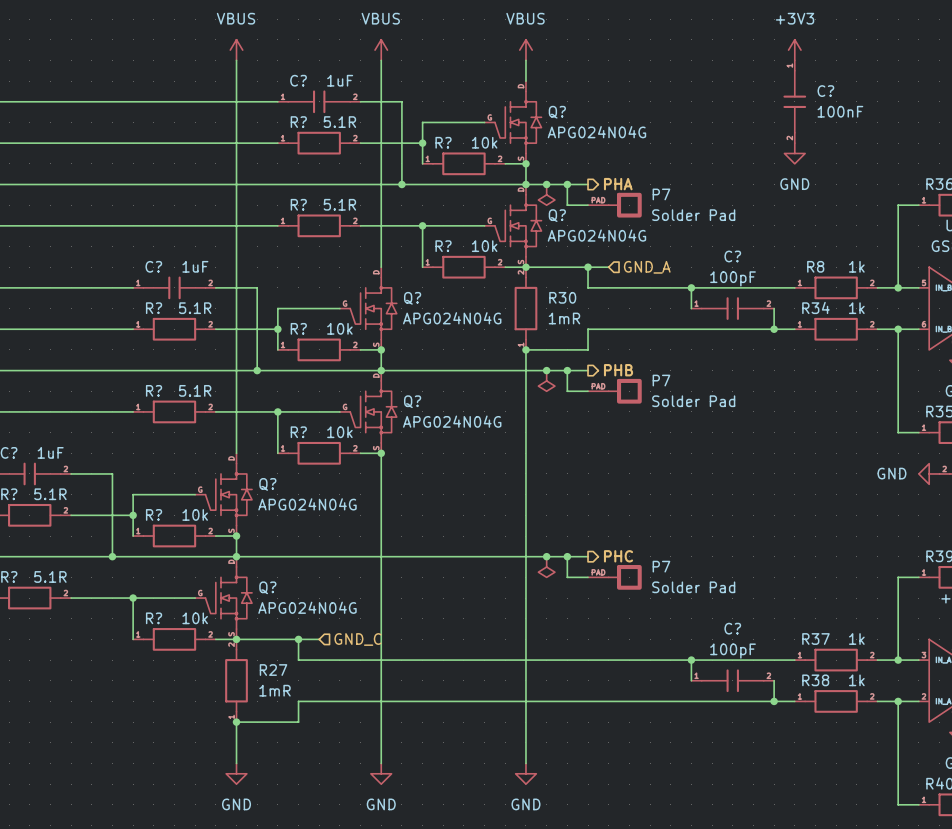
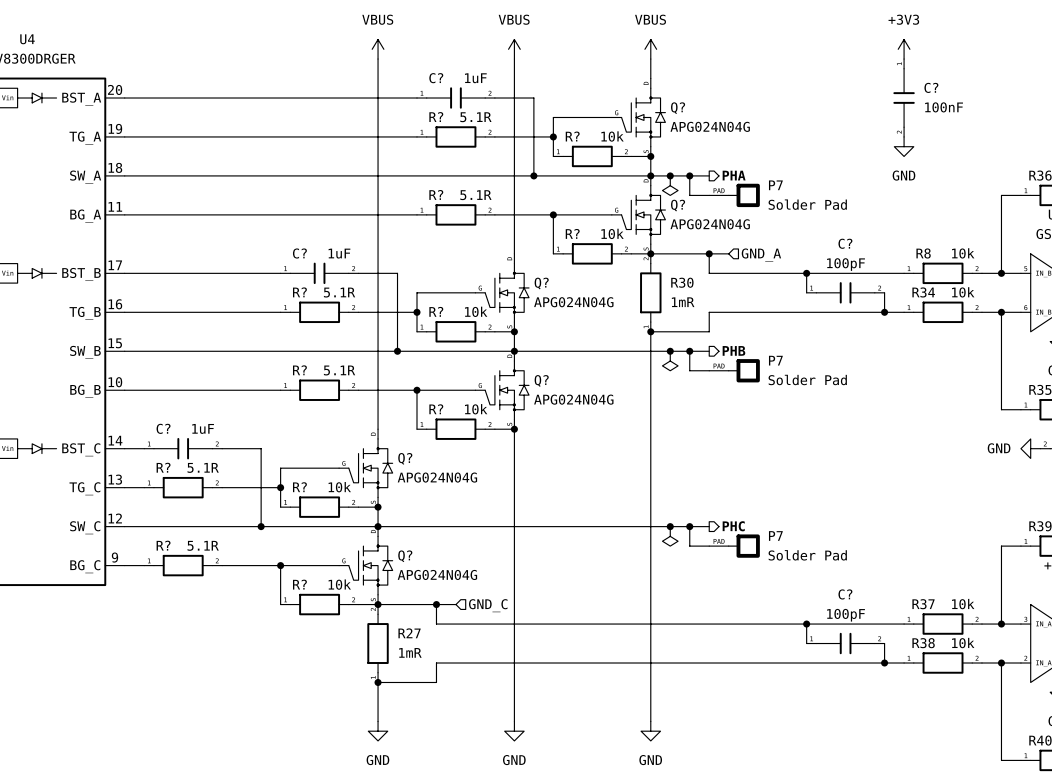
R8 value: 1k (856, 266) -> 10k (963, 253)
R34 value: 1k (856, 308) -> 10k (963, 292)
R37 value: 1k (856, 639) -> 10k (963, 604)
R38 value: 1k (856, 680) -> 10k (963, 643)

